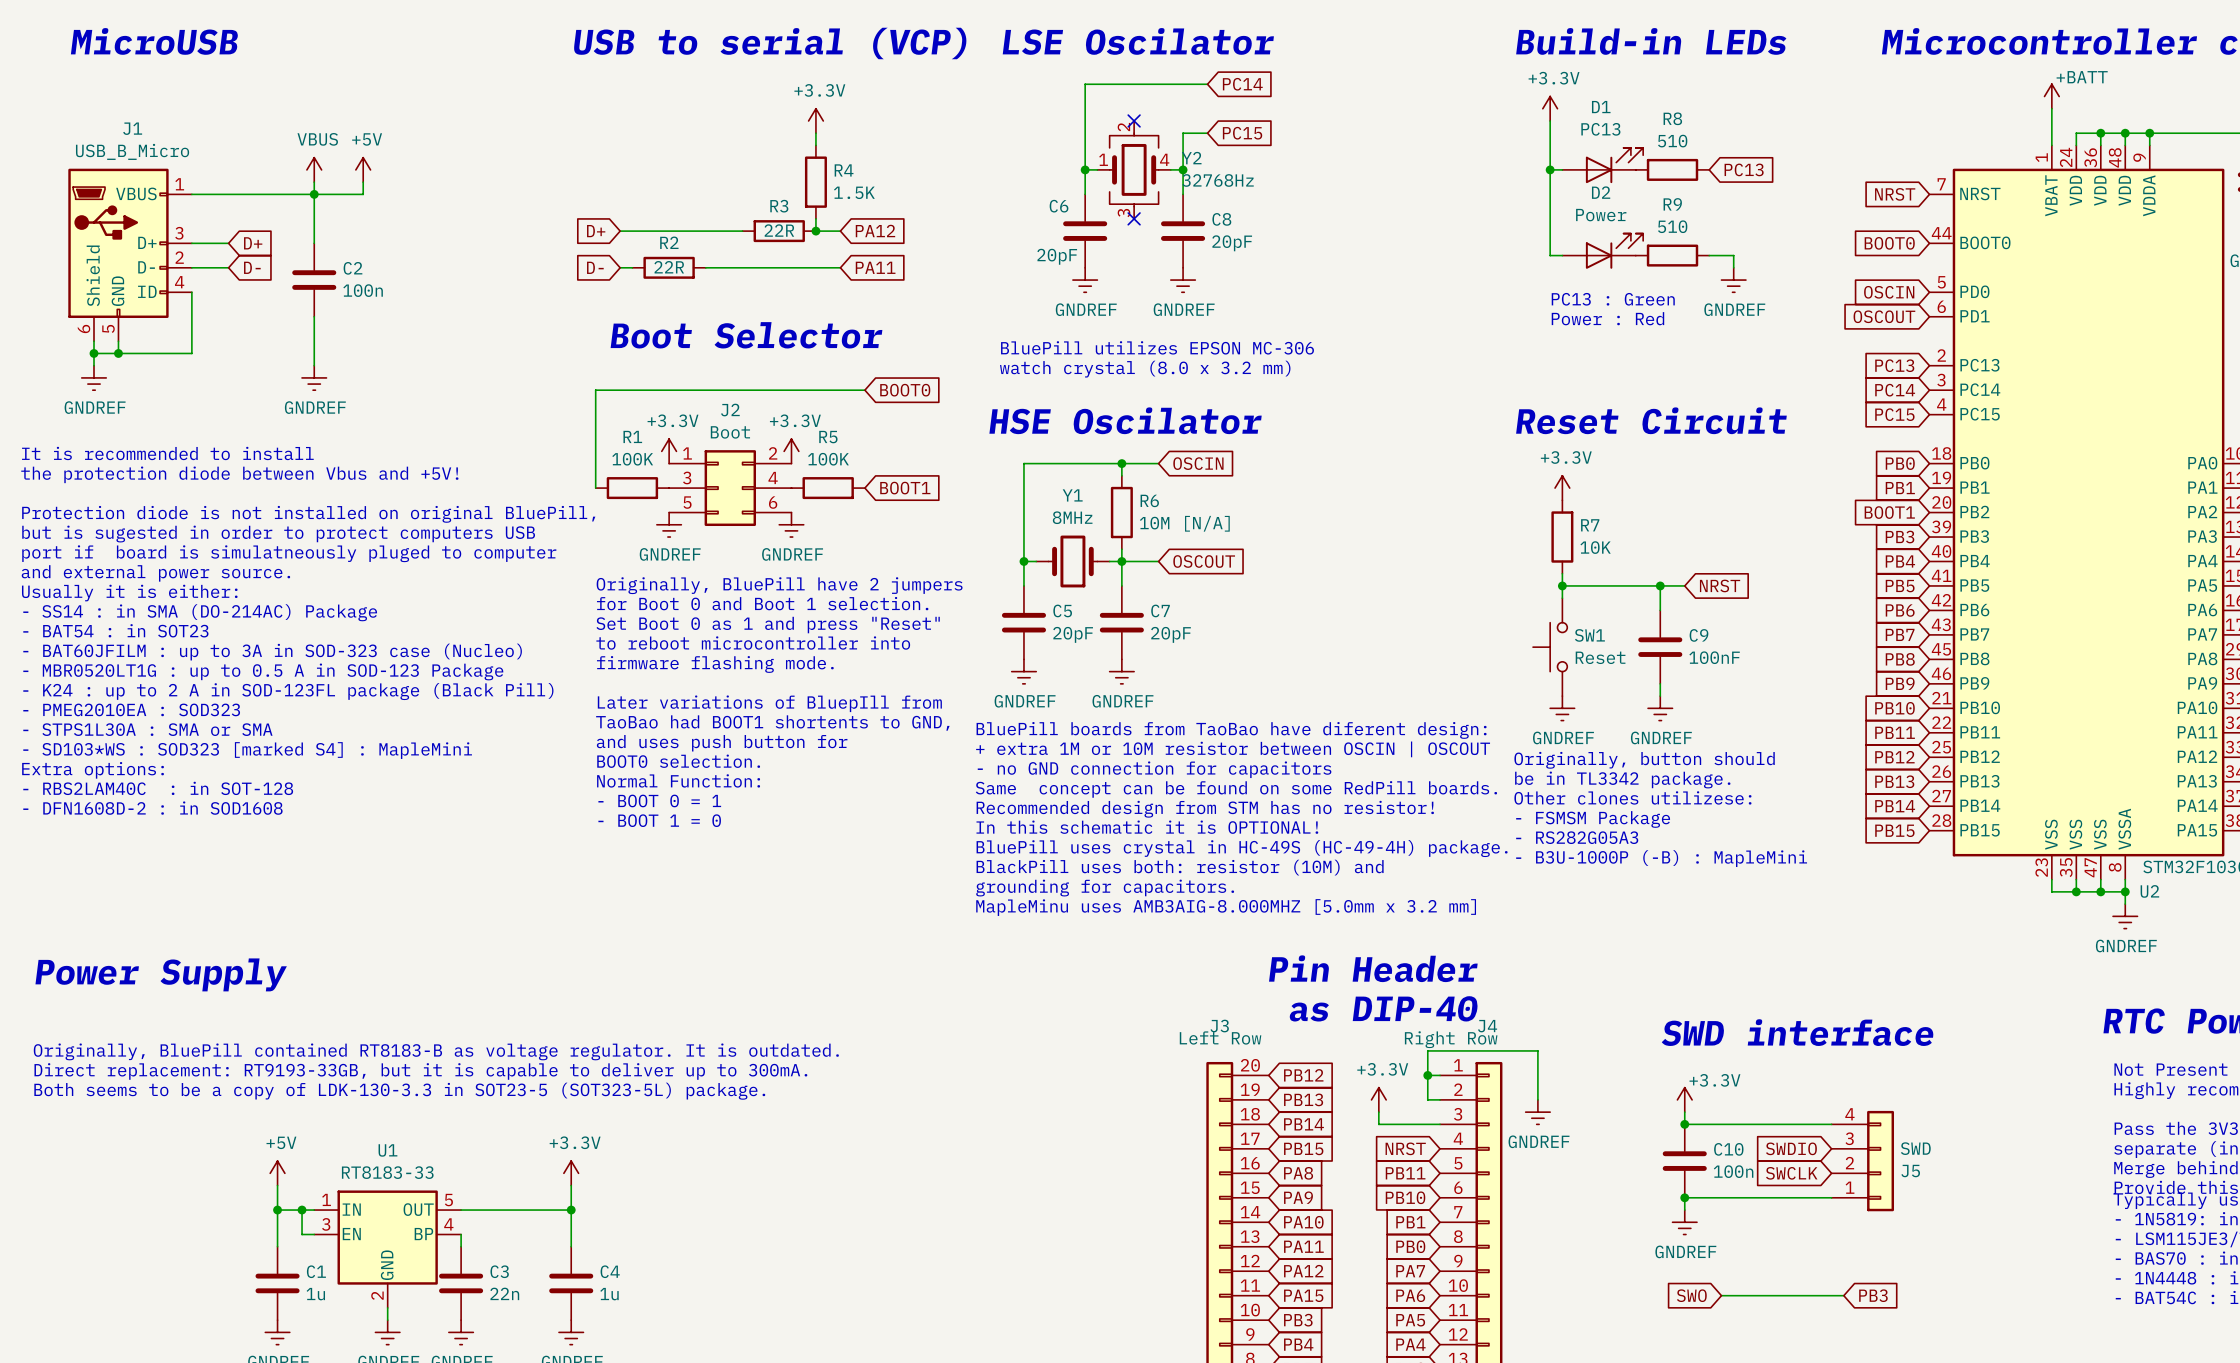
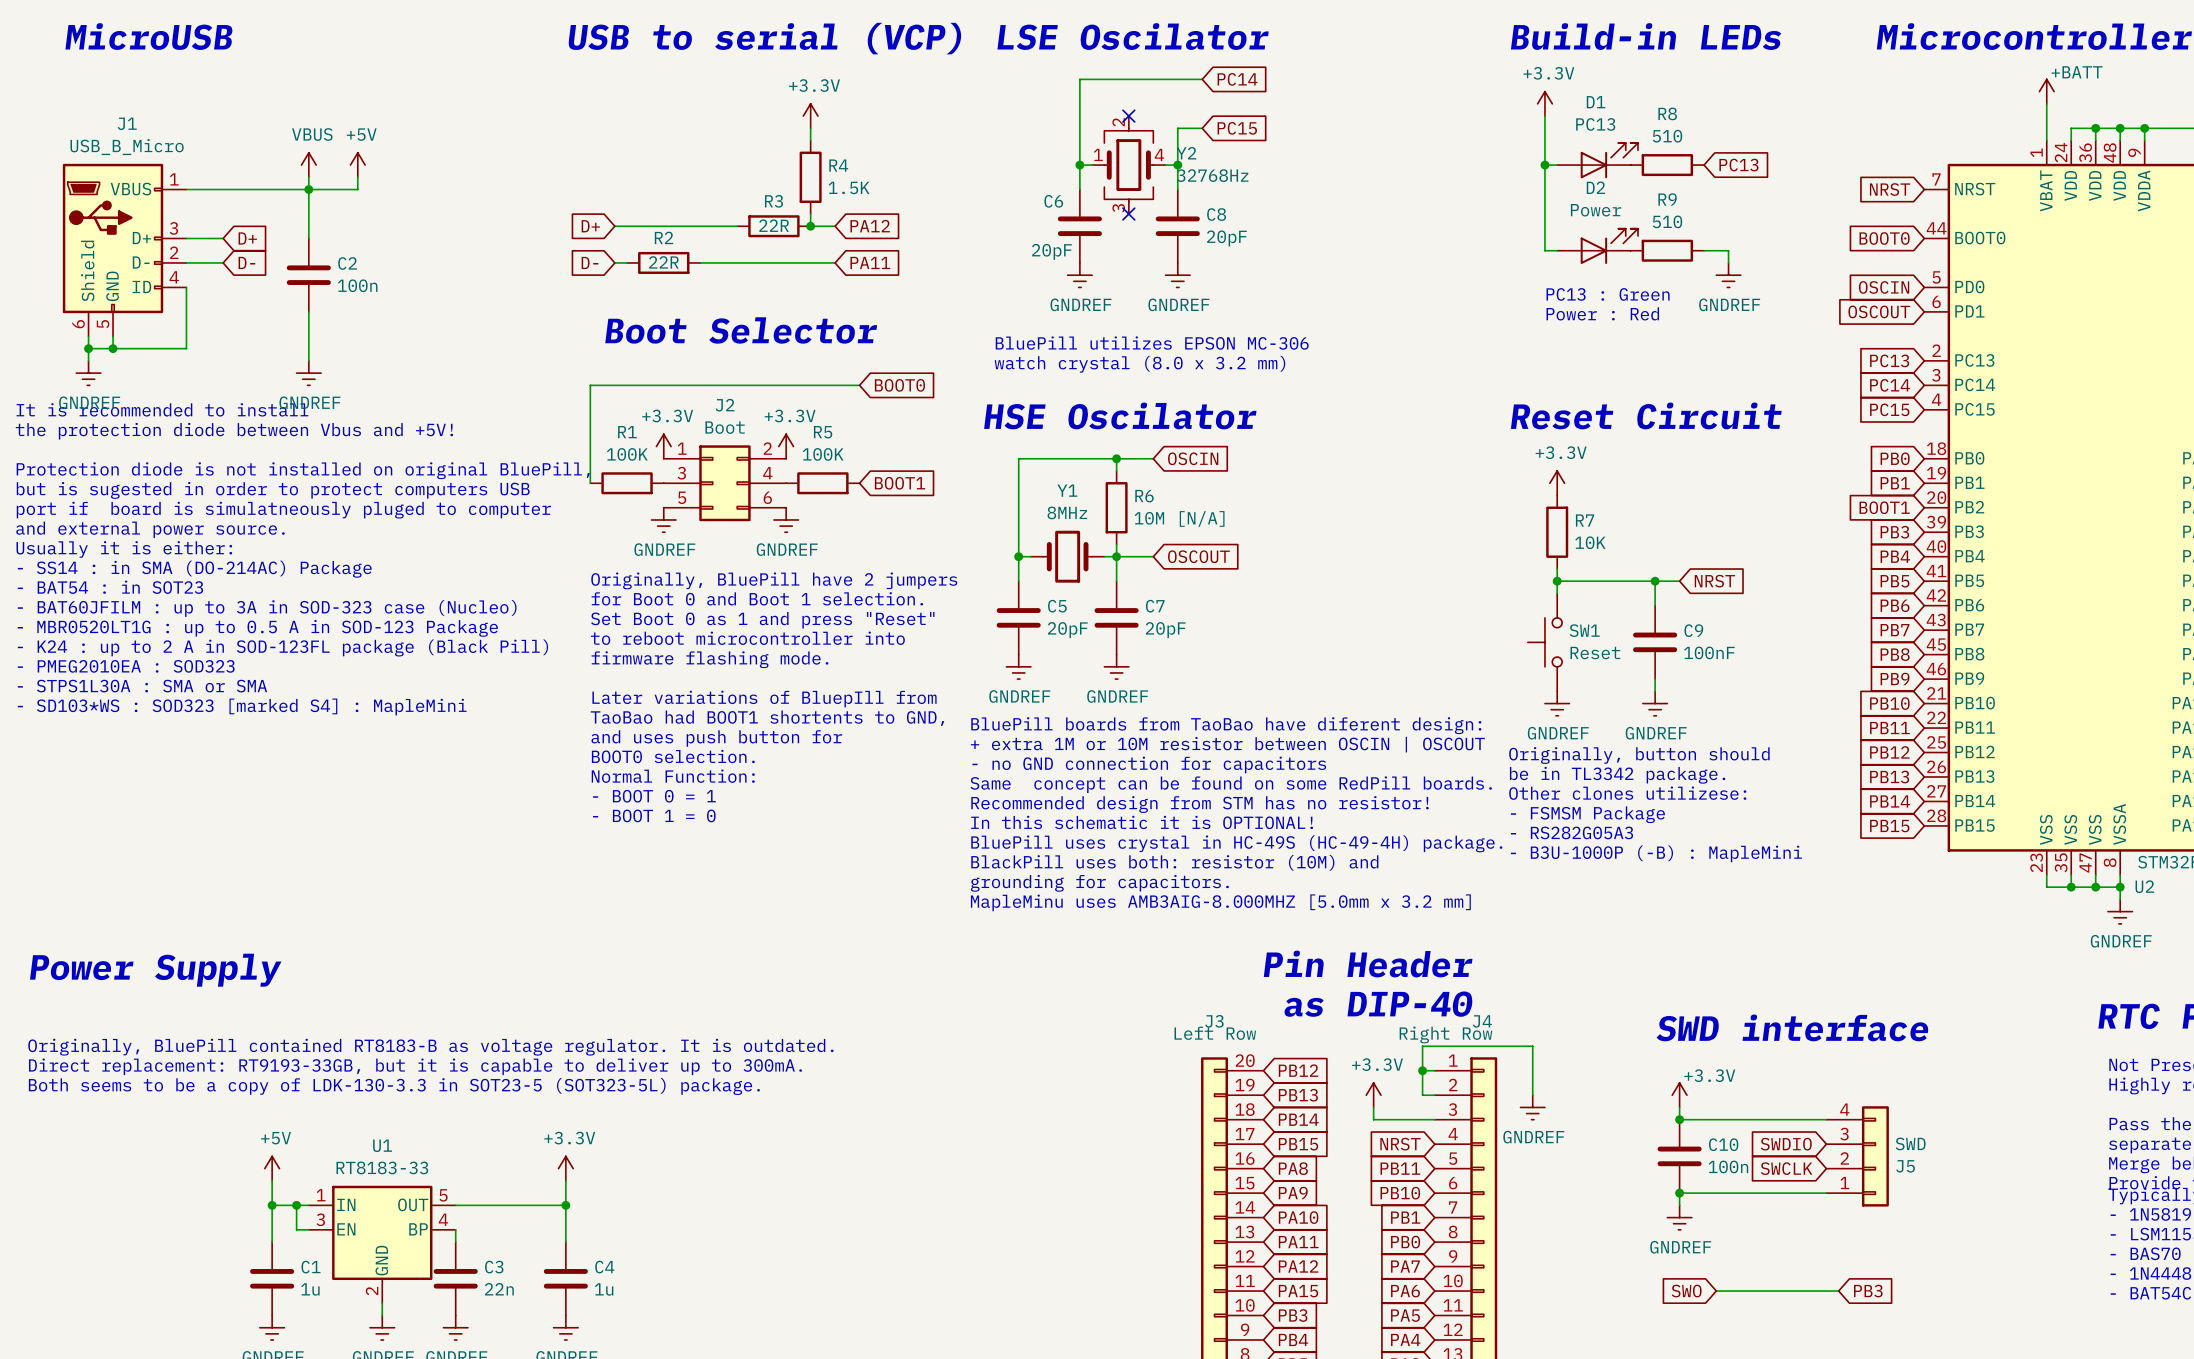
text: none -> the protection diode between Vbus and +5V! (234, 431)
text position: It is recommended to install (167, 453) -> It is recommended to install (162, 409)
text: the protection diode between Vbus and +5V! (239, 474) -> Protection diode is not installed on original BluePill, (303, 470)
text: none -> but is sugested in order to protect computers USB (273, 490)
text: Protection diode is not installed on original BluePill, (308, 514) -> port if board is simulatneously pluged to computer (283, 510)
text: but is sugested in order to protect computers USB (278, 534) -> and external power source. (150, 529)
text: port if board is simulatneously pluged to computer (289, 553) -> Usually it is either: (124, 549)
text: and external power source. (155, 573) -> - SS14 : in SMA (DO-214AC) Package (194, 569)
text: Usually it is either: (129, 593) -> - BAT54 : in SOT23 (110, 587)
text: - SS14 : in SMA (DO-214AC) Package (200, 612) -> - BAT60JFILM : up to 3A in SOD-323 case (Nucleo) (267, 608)
text: - BAT54 : in SOT23 (115, 630) -> - MBR0520LT1G : up to 0.5 A in SOD-123 Package (257, 628)
text: - BAT60JFILM : up to 3A in SOD-323 case (Nucleo) (272, 652) -> - K24 : up to 2 A in SOD-123FL package (Black Pill) (282, 647)
text: - MBR0520LT1G : up to 0.5 A in SOD-123 Package (263, 671) -> - PMEG2010EA : SOD323 (126, 666)
text: - K24 : up to 2 A in SOD-123FL package (Black Pill) (288, 691) -> - STPS1L30A : SMA or SMA (142, 686)
text: - PMEG2010EA : SOD323 (131, 709) -> - SD103*WS : SOD323 [marked S4] : MapleMini (242, 706)
text: - STPS1L30A : SMA or SMA (147, 729) -> none
text: - SD103*WS : SOD323 [marked S4] : MapleMini (247, 750) -> none
text: Extra options: (93, 770) -> none
text: - RBS2LAM40C : in SOT-128 (158, 788) -> none
text: - DFN1608D-2 : in SOD1608 (152, 808) -> none

